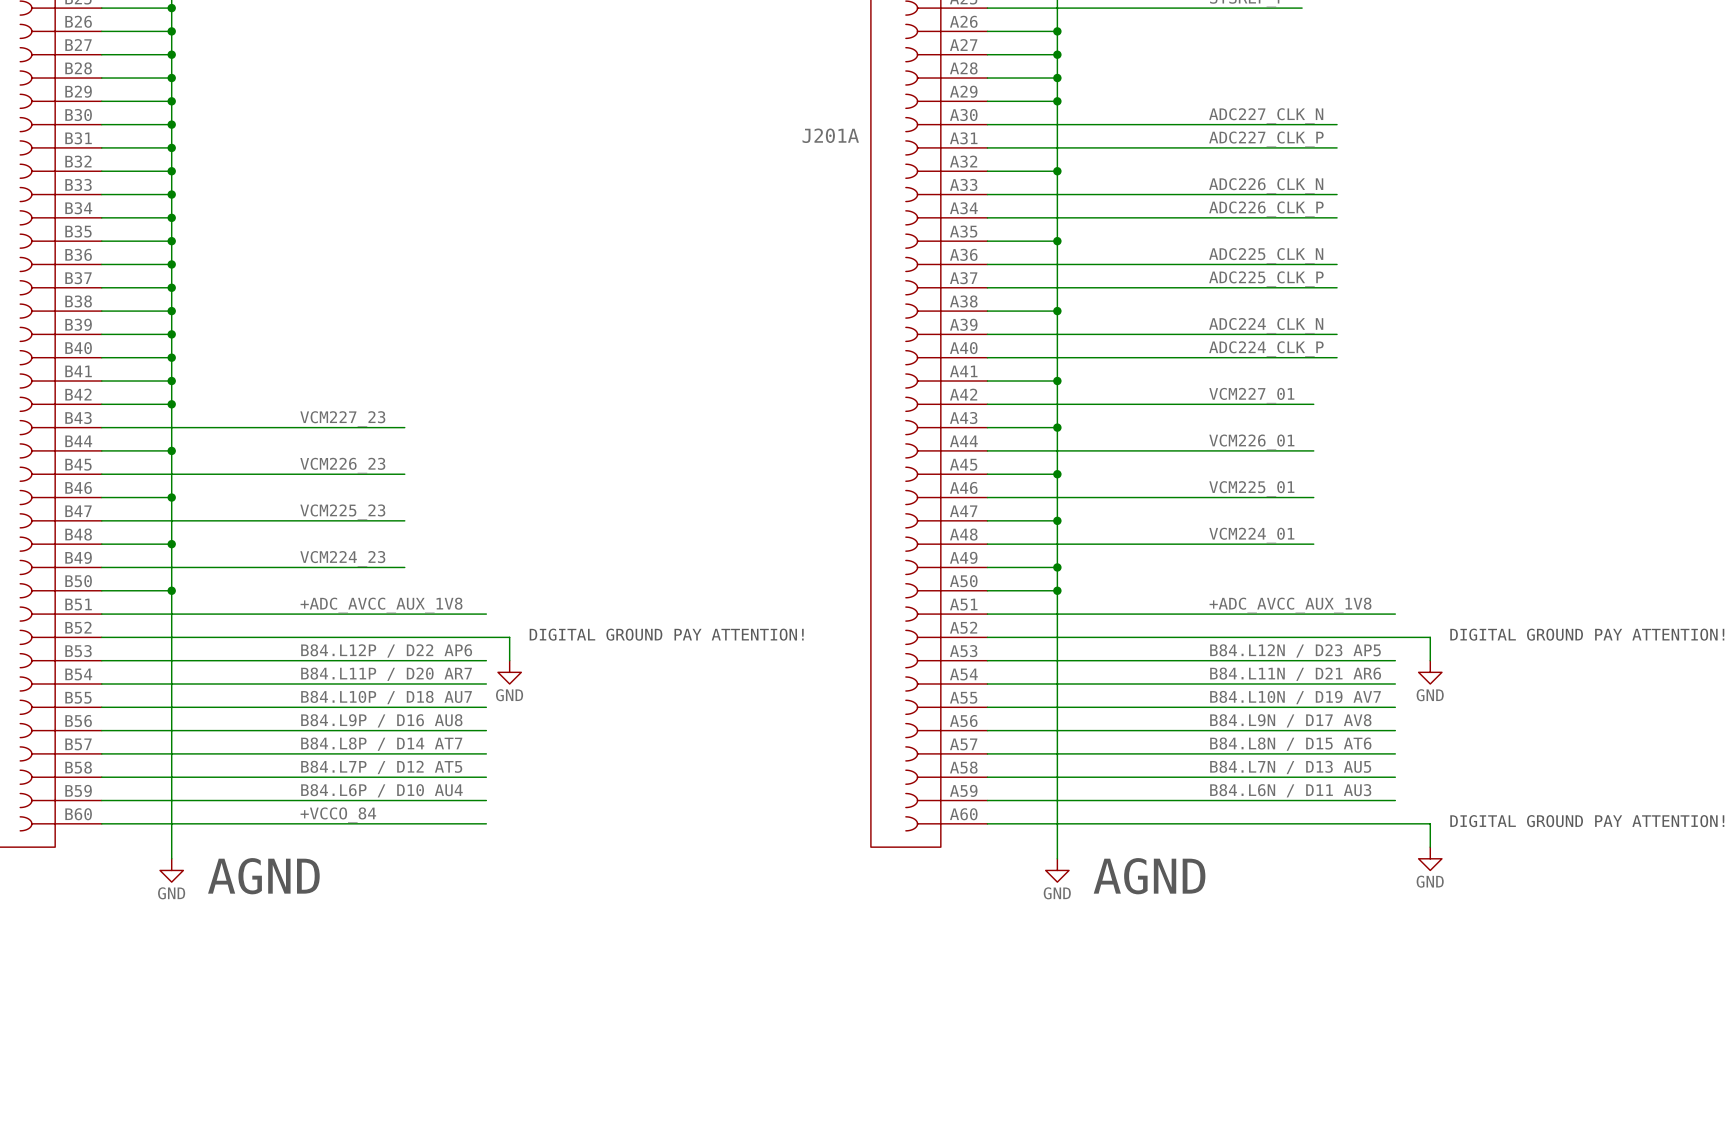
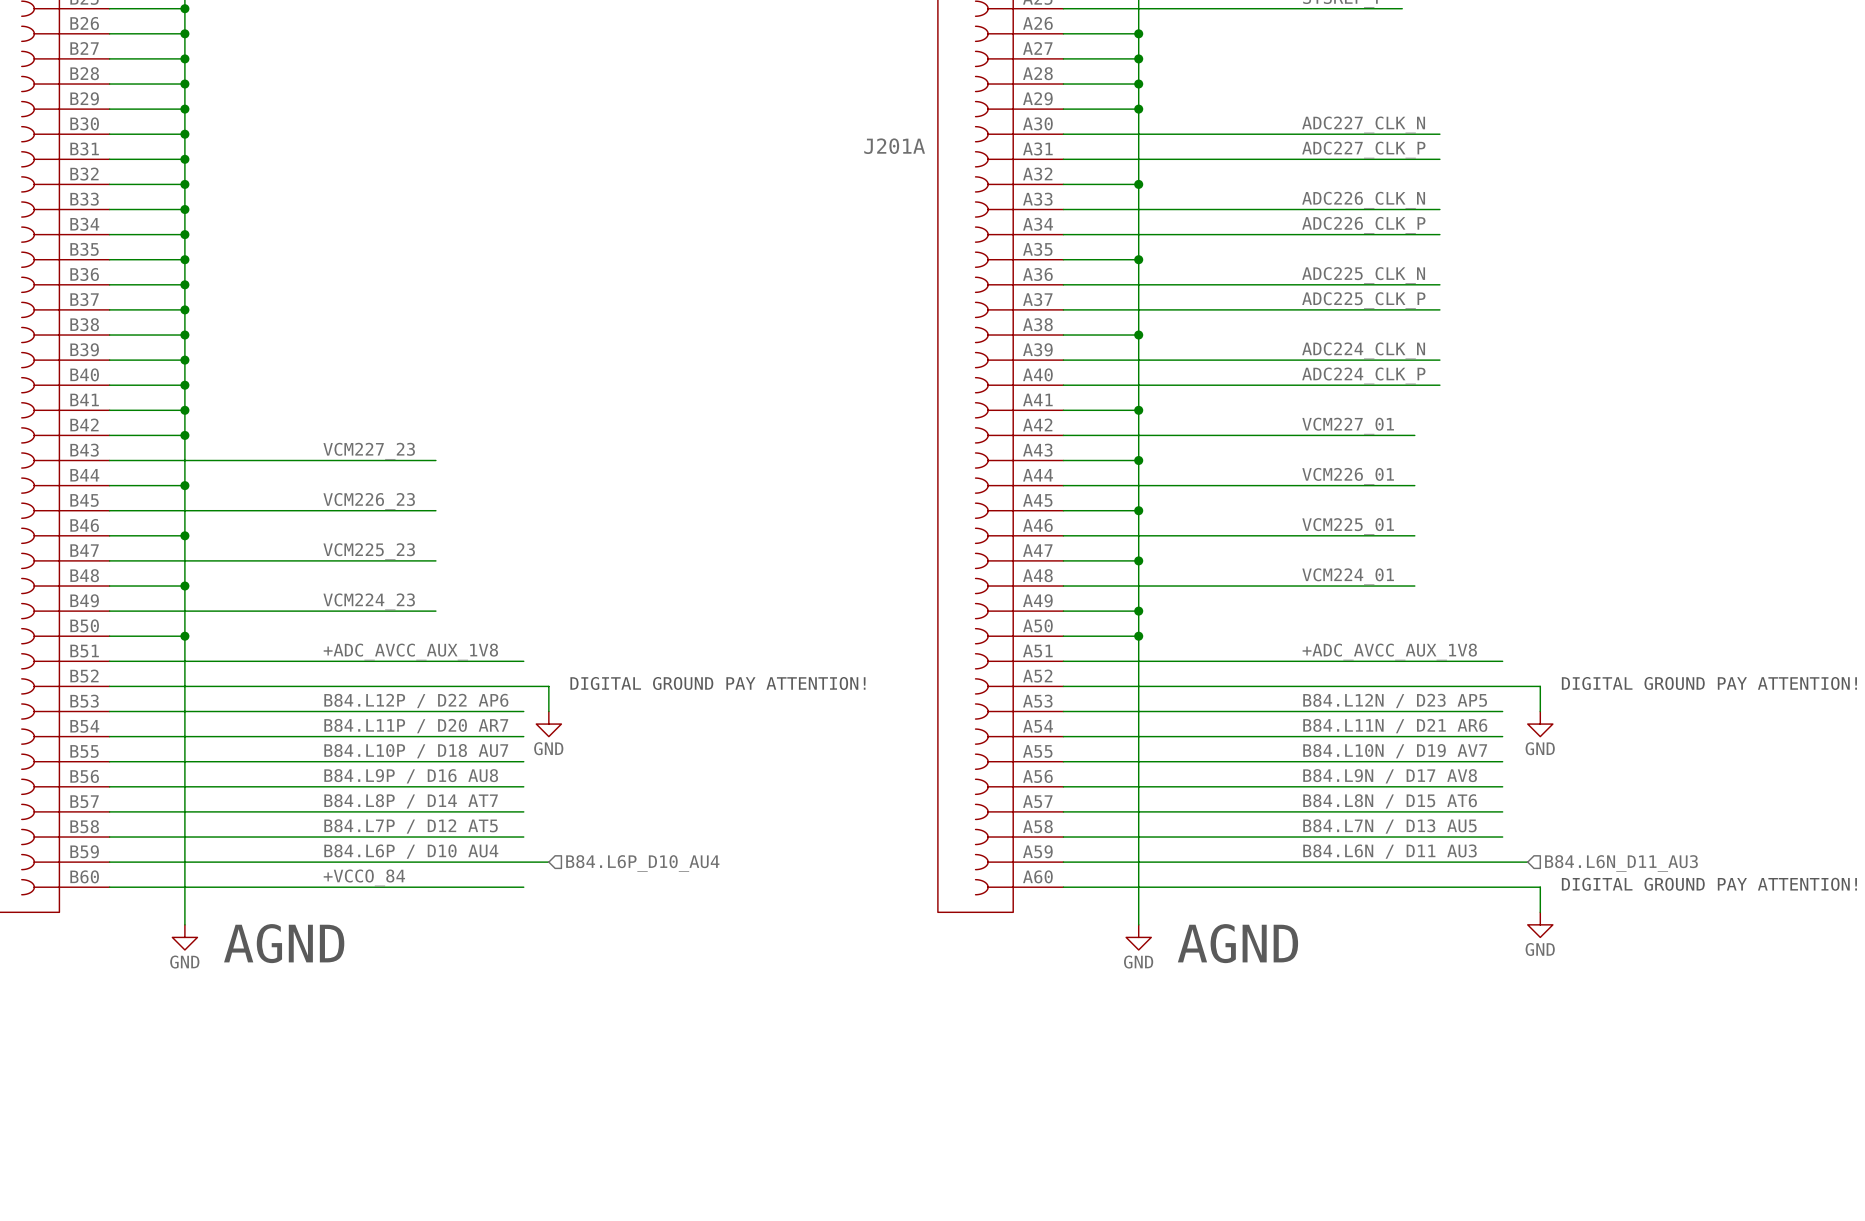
wire: none -> (523, 862) (548, 862)
wire: none -> (1502, 862) (1527, 862)
hierarchical label: none -> B84.L6P_D10_AU4 (642, 863)
hierarchical label: none -> B84.L6N_D11_AU3 (1621, 863)

